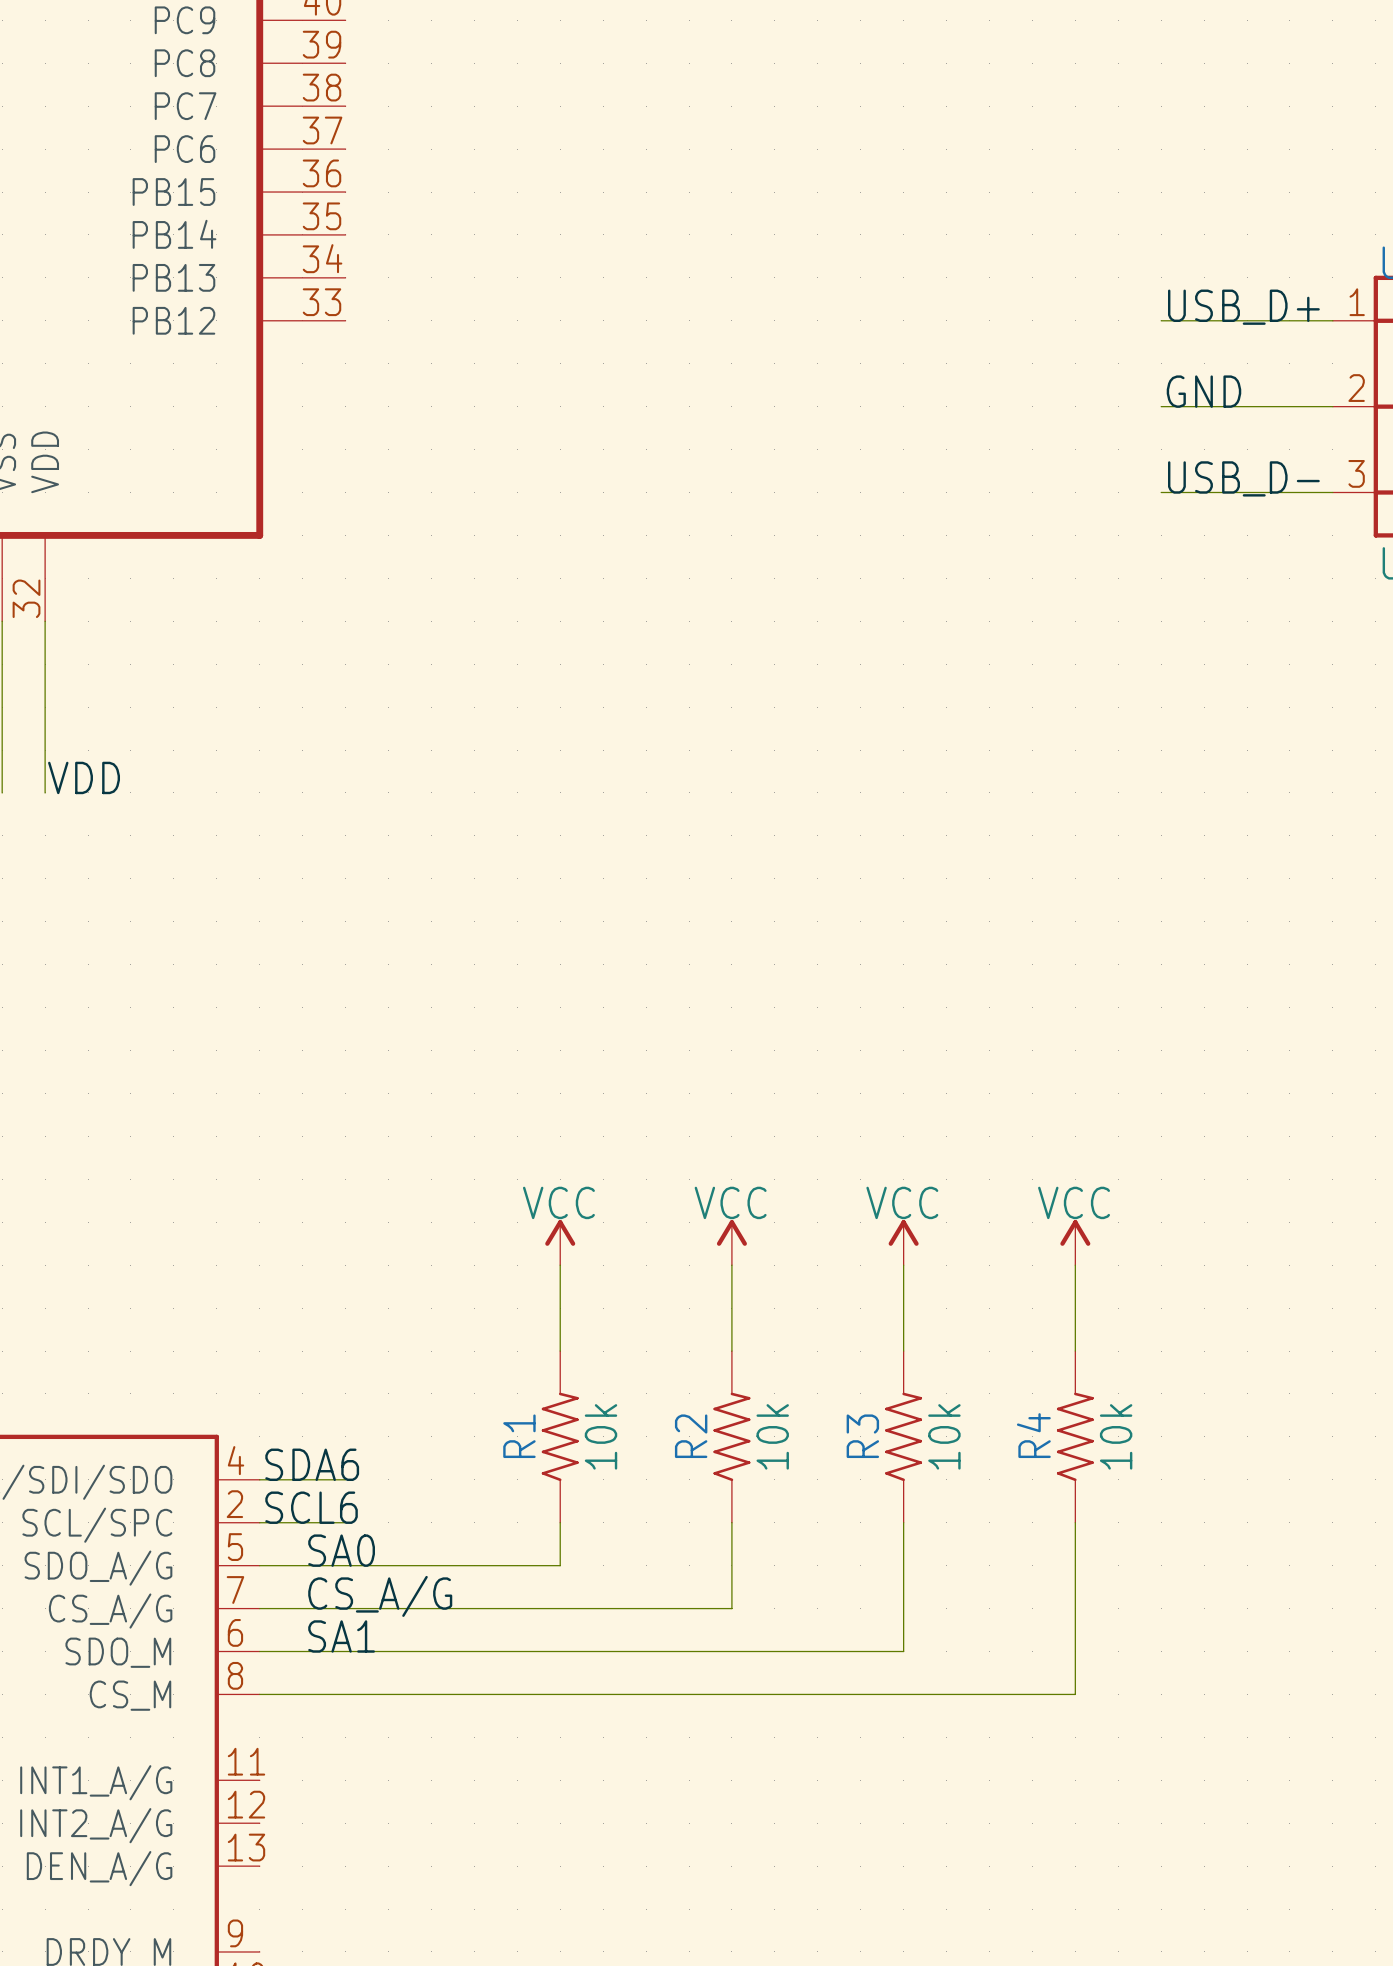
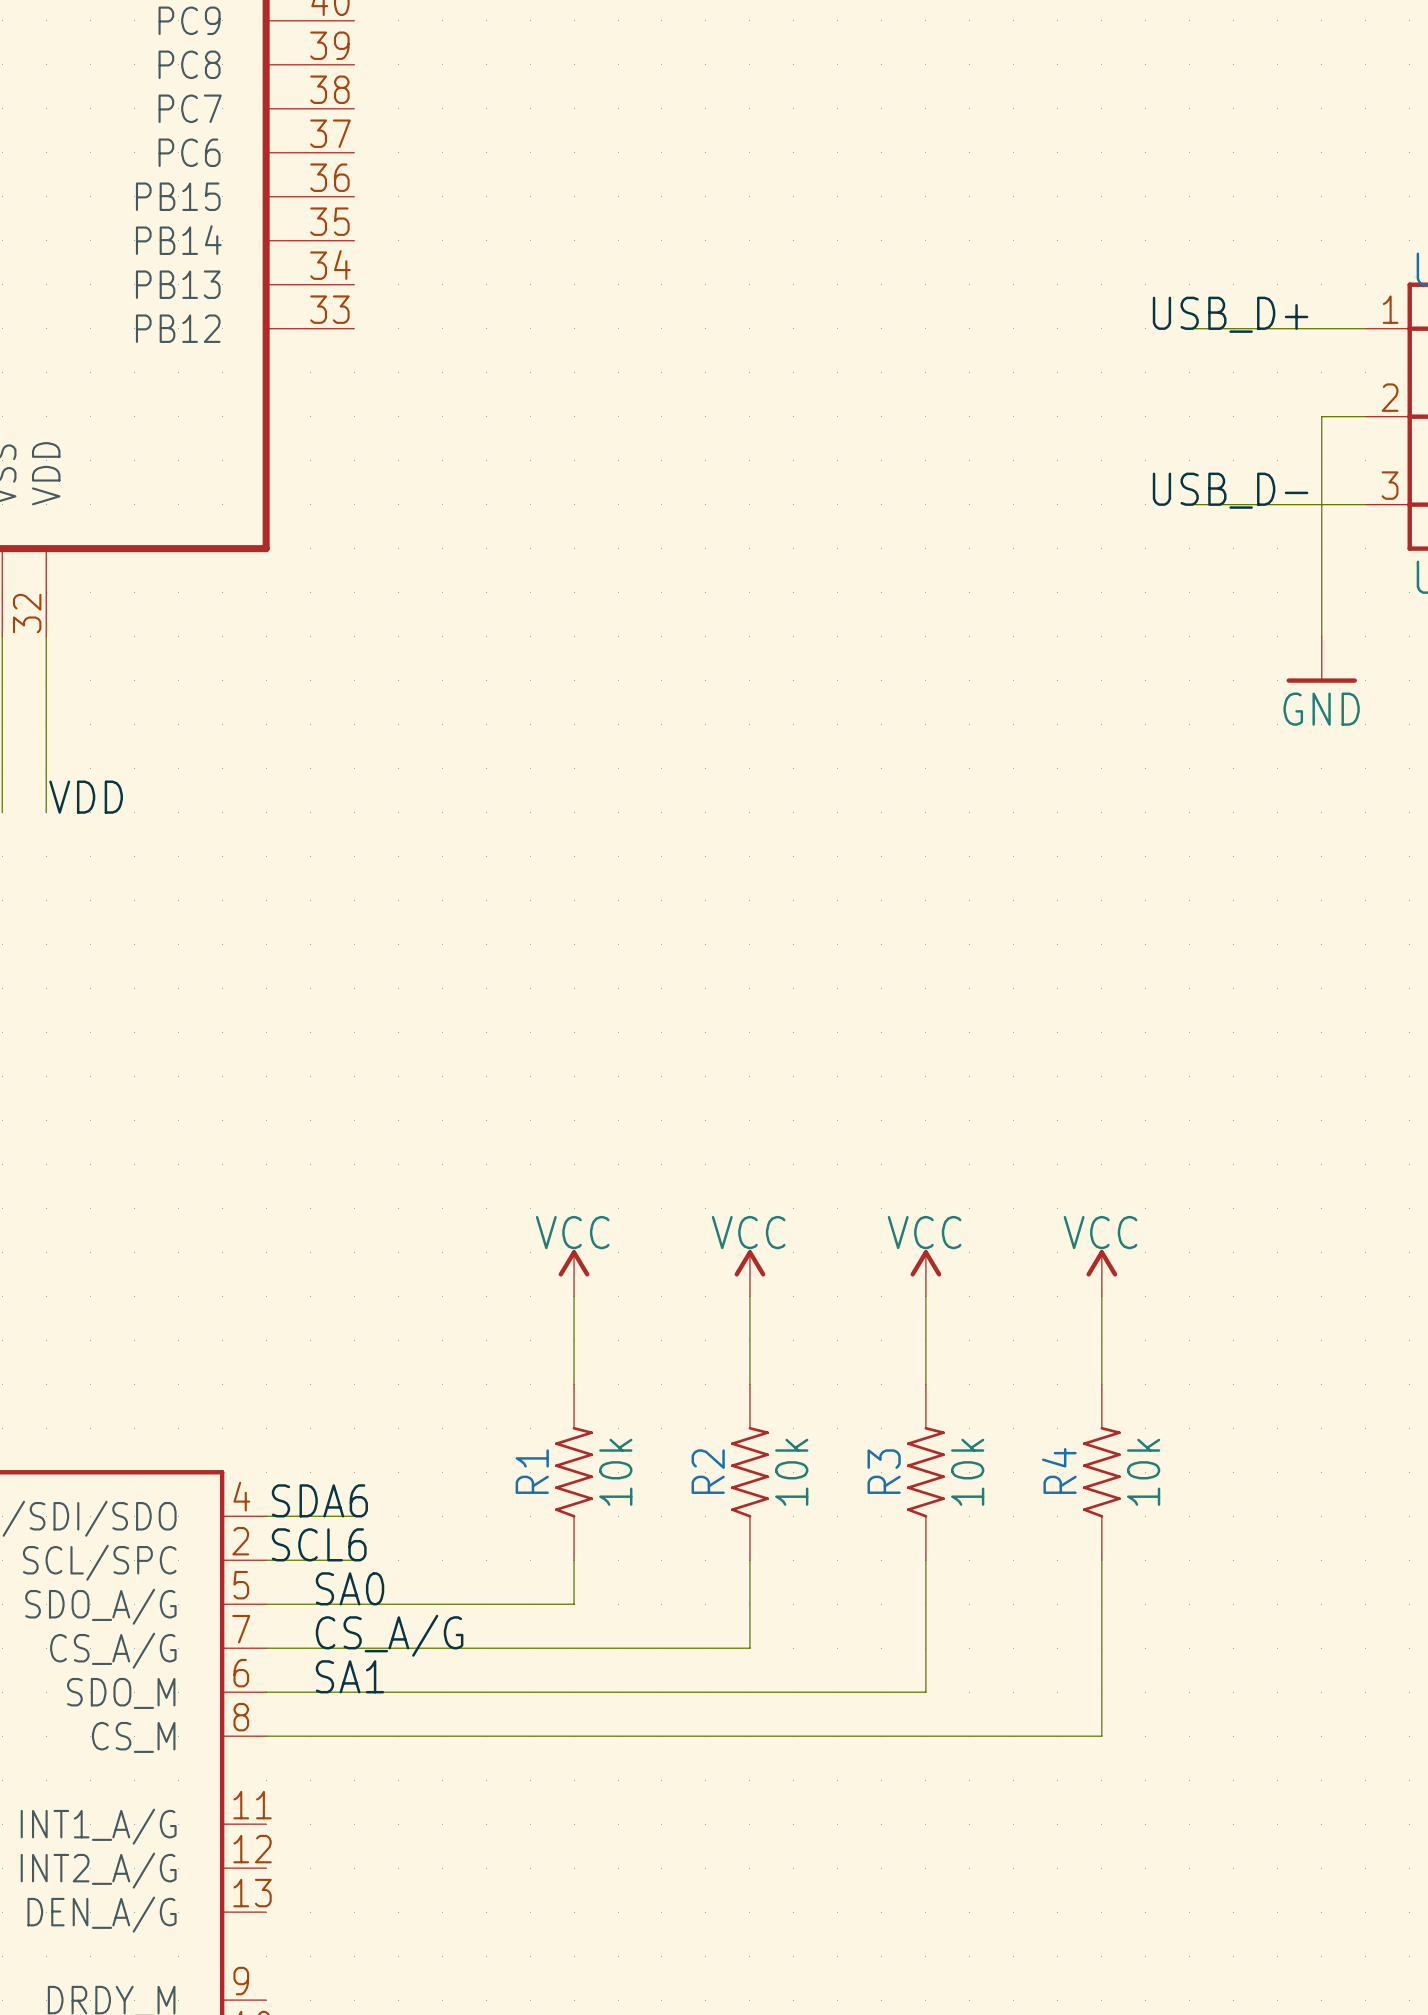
label position: USB_D+ (1243, 307) -> USB_D+ (1230, 314)
label: GND (1203, 391) -> none
wire: (1161, 406) (1289, 406) -> (1321, 636) (1321, 416)
label position: USB_D- (1243, 478) -> USB_D- (1230, 490)
power symbol: none -> GND (1321, 659)

